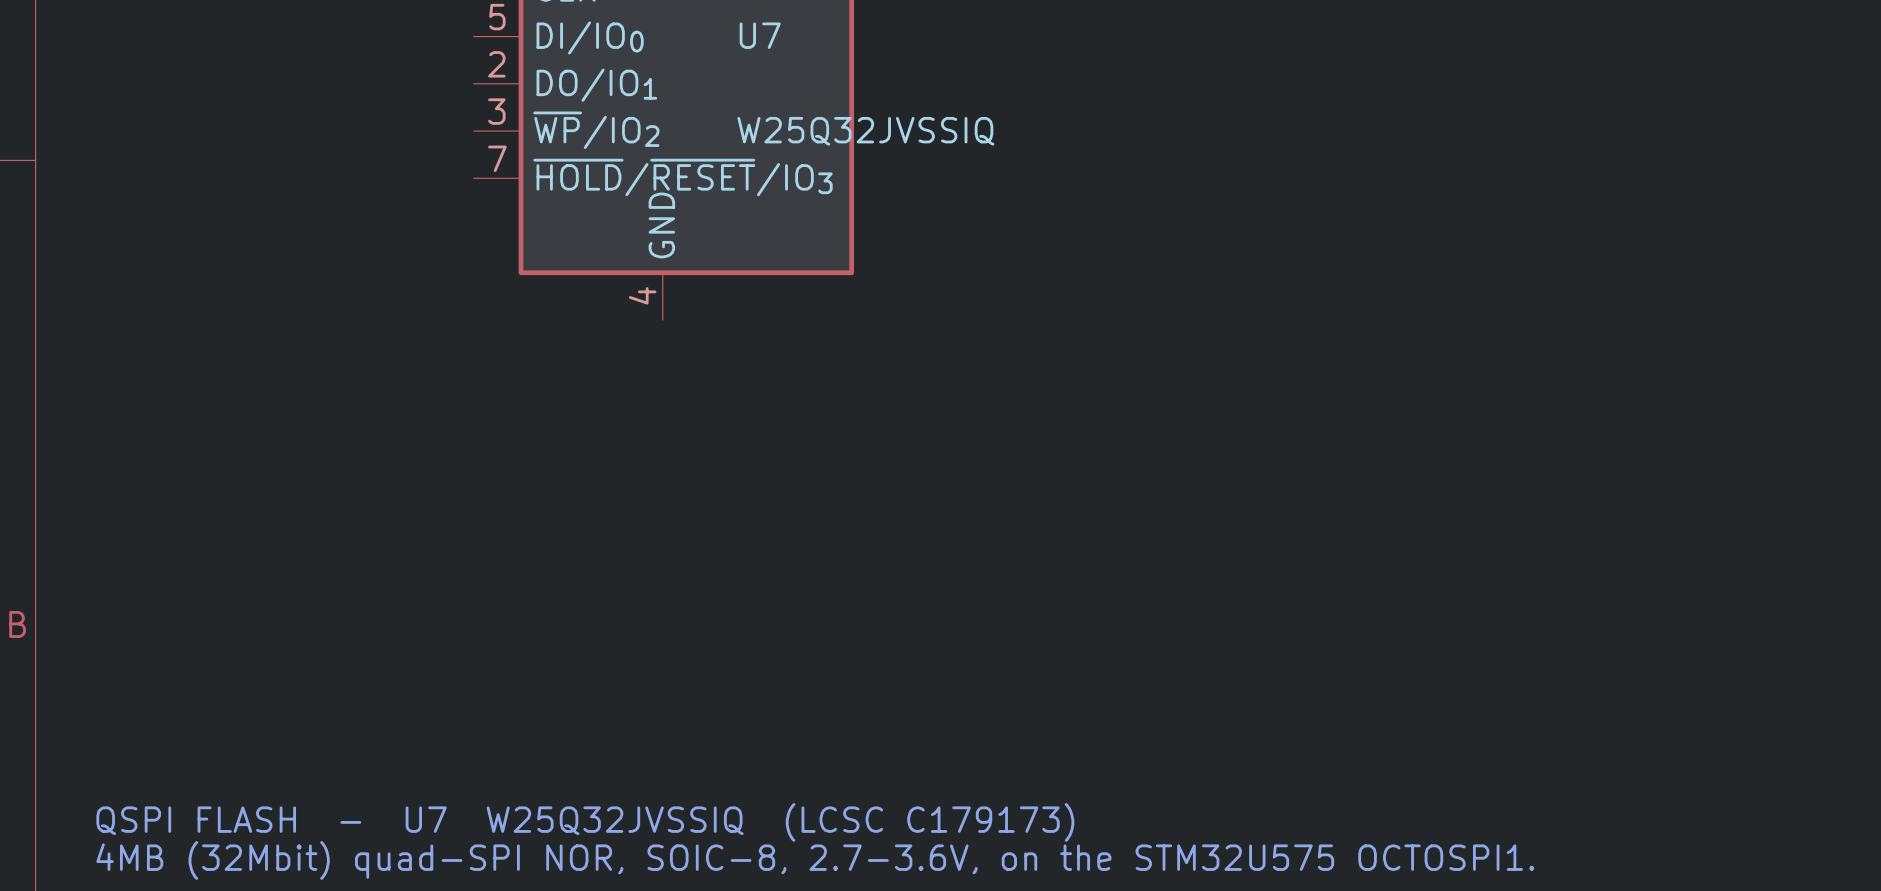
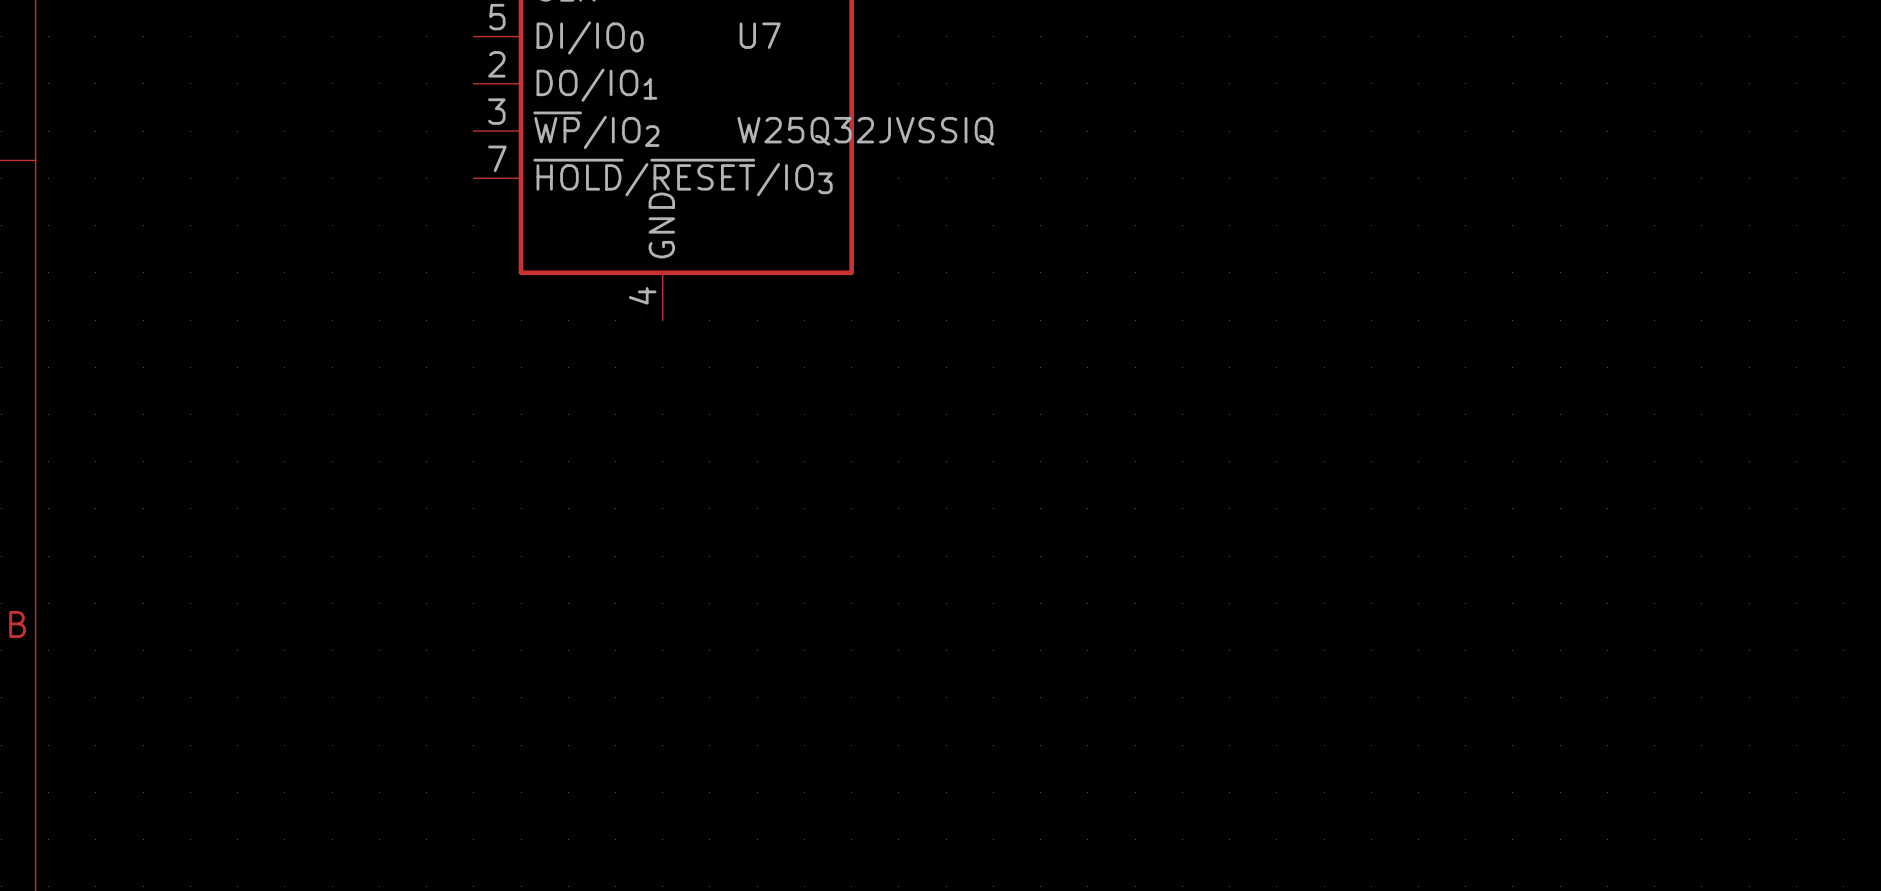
text: QSPI FLASH - U7 W25Q32JVSSIQ (LCSC C179173) (585, 822) -> none
text: 4MB (32Mbit) quad-SPI NOR, SOIC-8, 2.7-3.6V, on the STM32U575 OCTOSPI1. (815, 860) -> none

